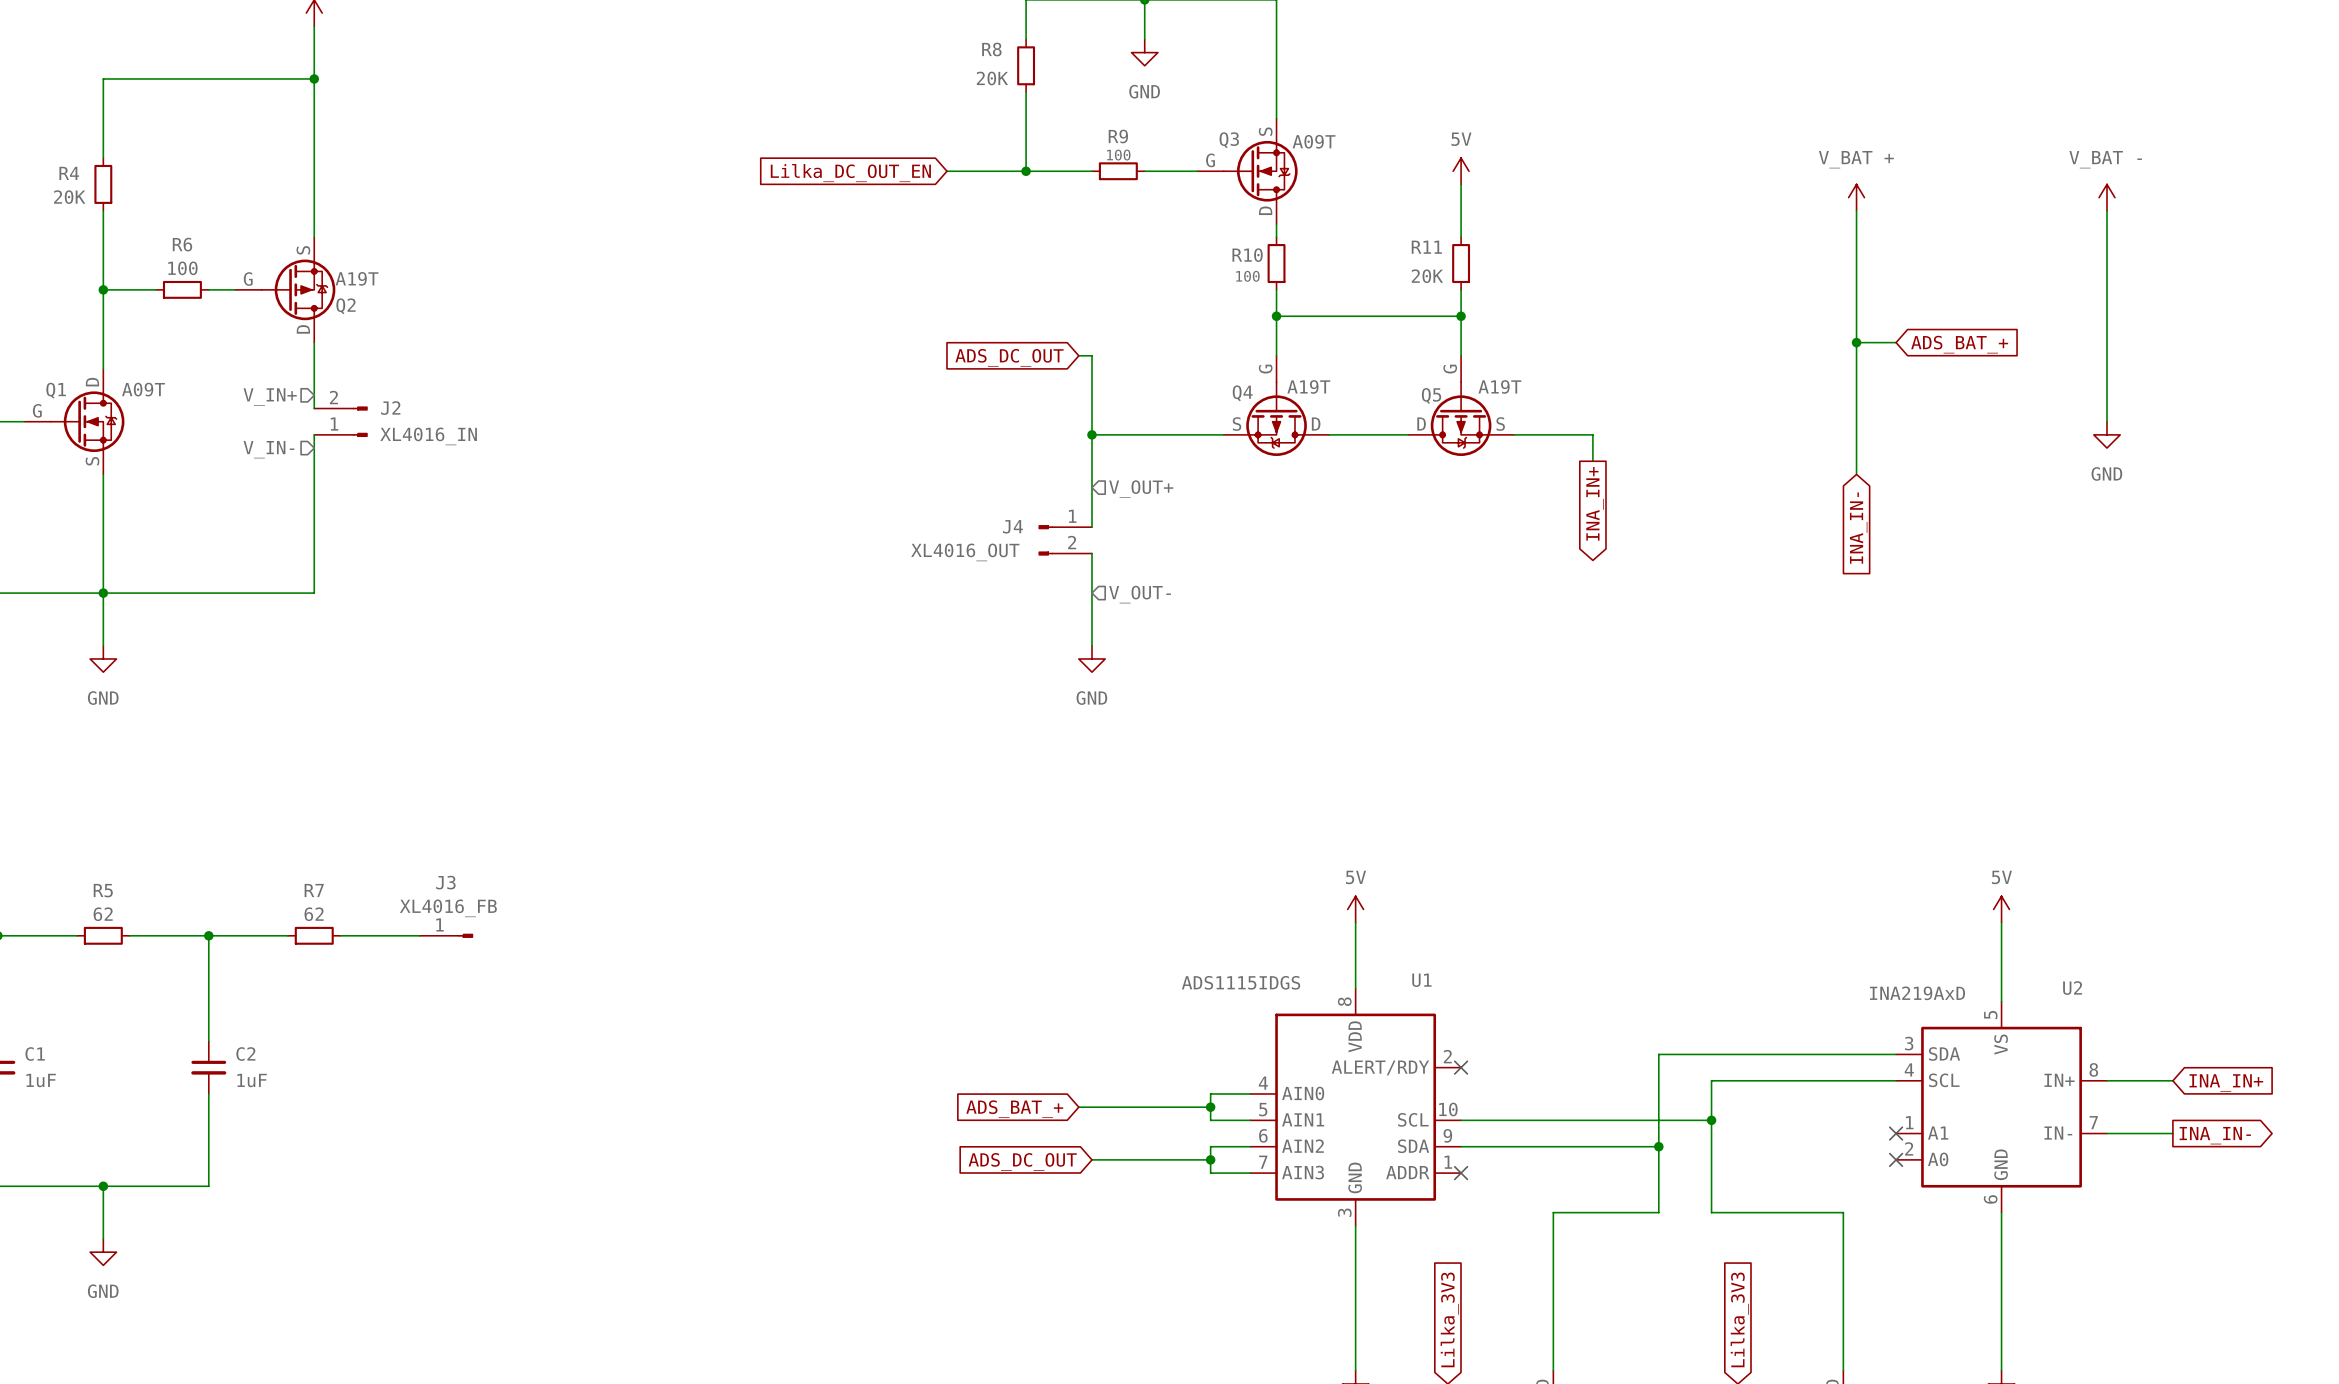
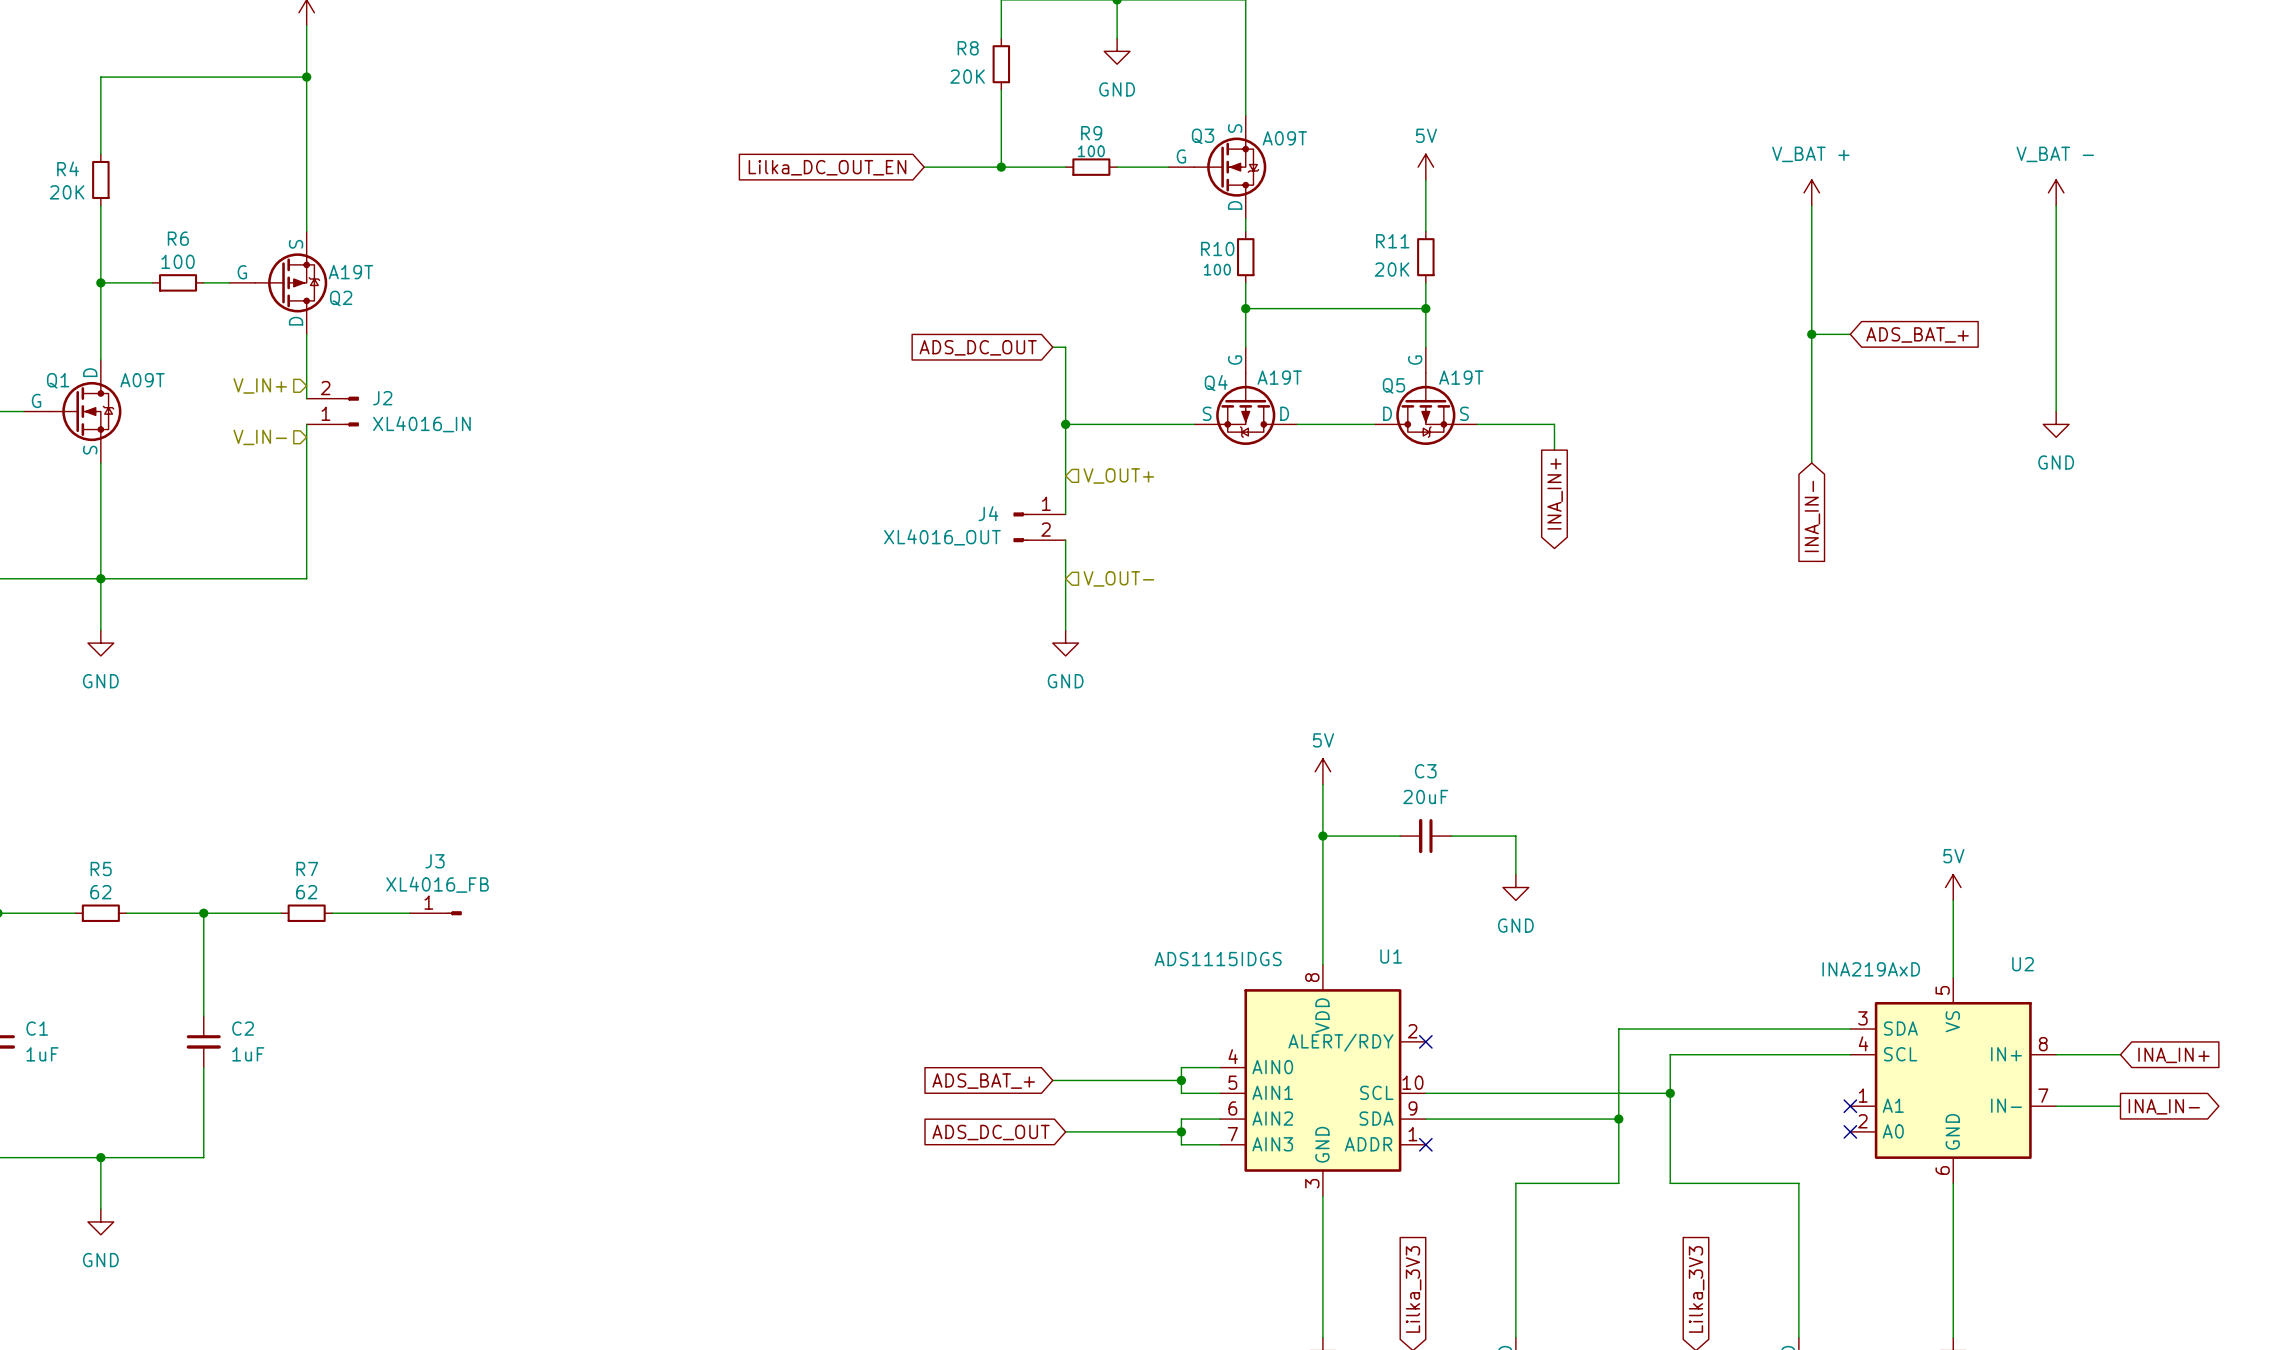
wire: none -> (1322, 784) (1322, 900)
wire: none -> (1322, 836) (1400, 836)
junction: none -> (1322, 836)
C3: none -> 20uF (1425, 836)
wire: none -> (1451, 836) (1515, 836) (1515, 874)
power symbol position: 5V (1355, 909) -> 5V (1322, 771)
power symbol: none -> GND (1515, 887)

